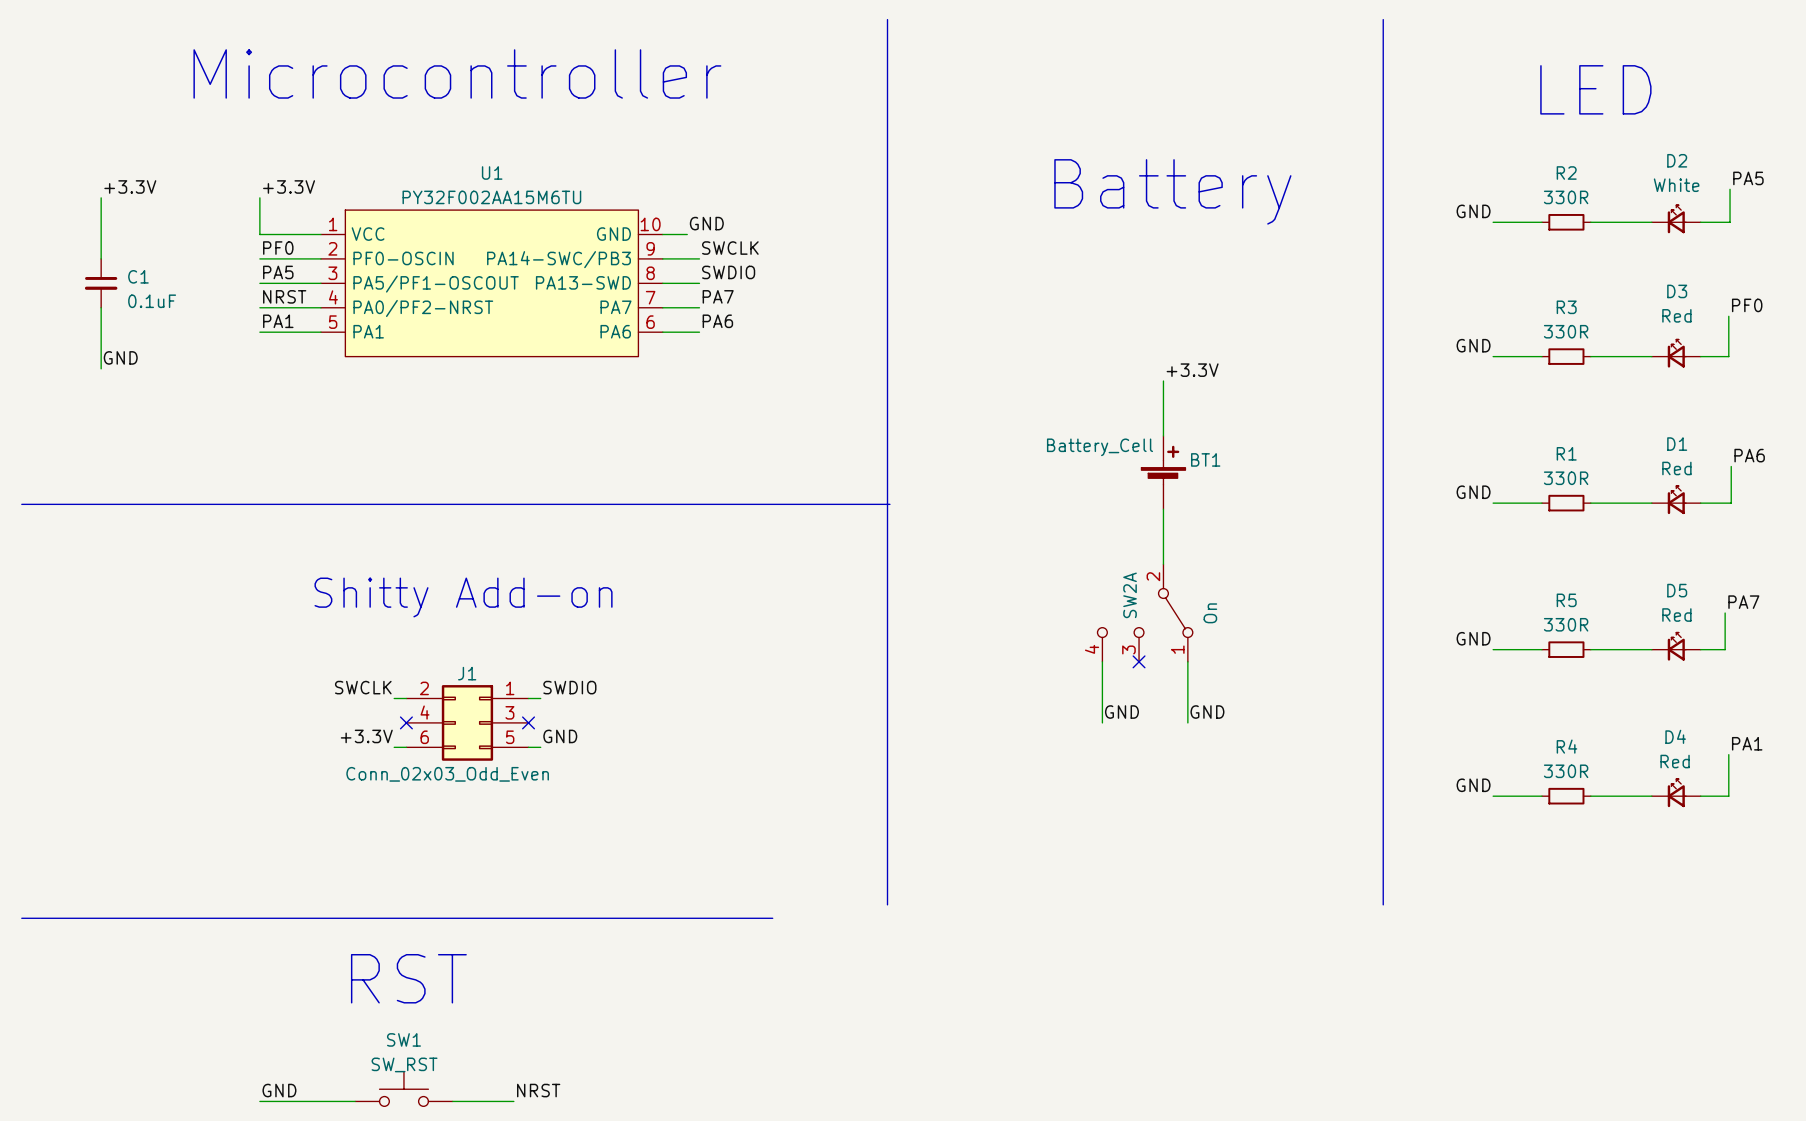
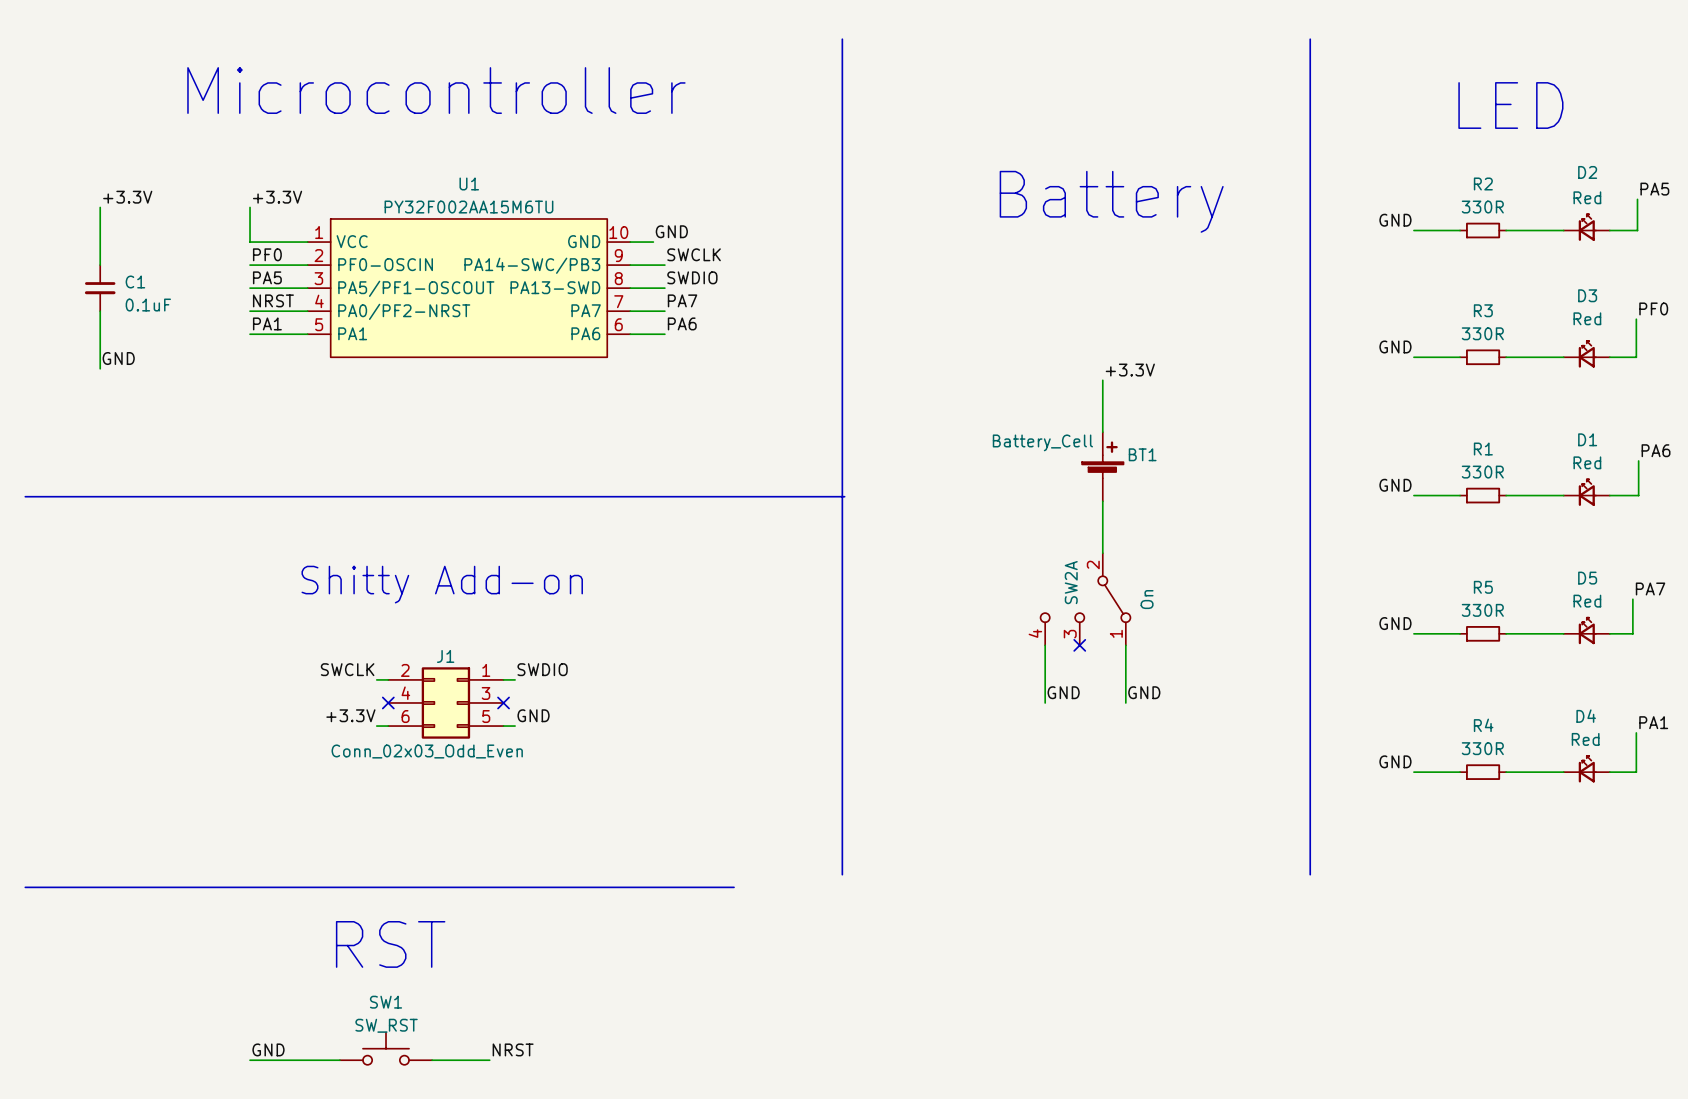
D2 value: White (1676, 185) -> Red (1587, 197)

